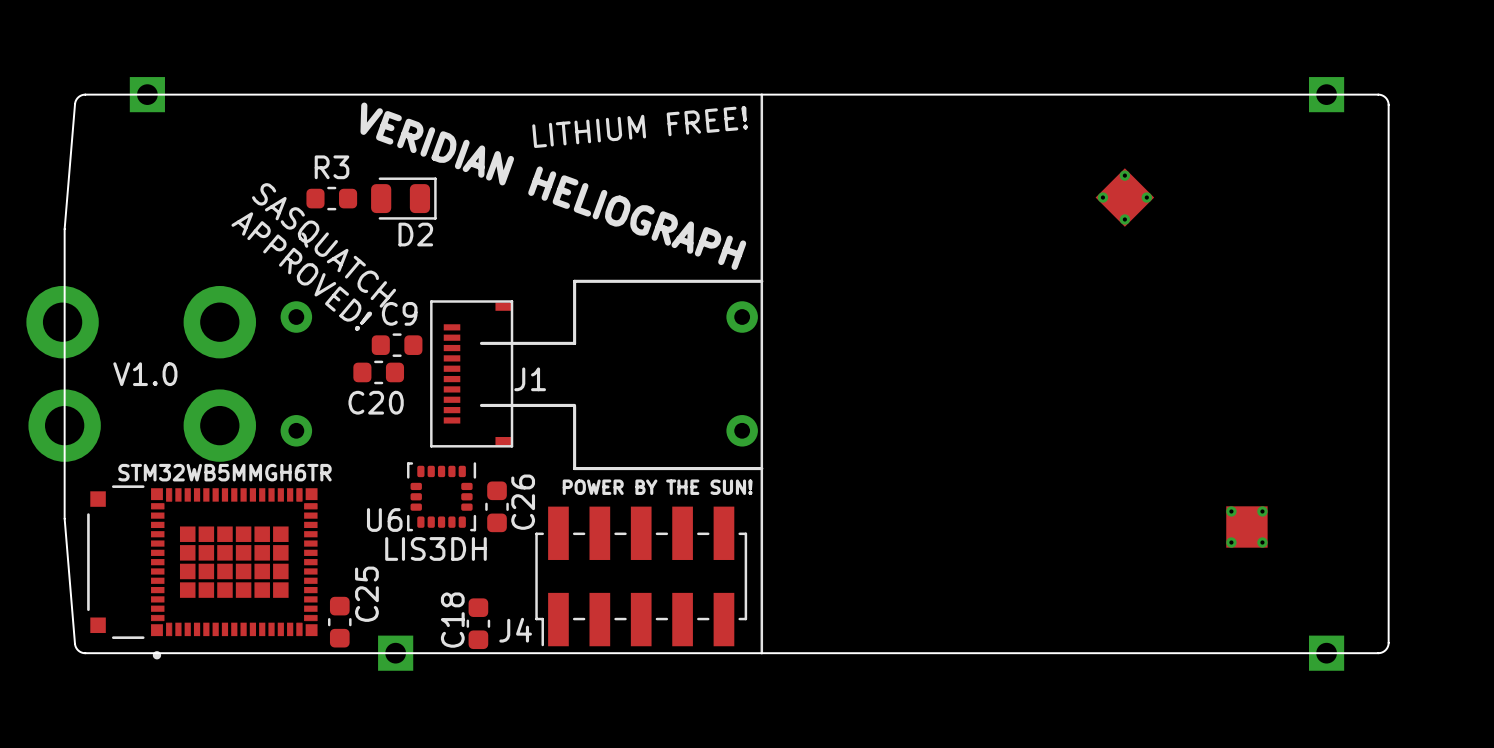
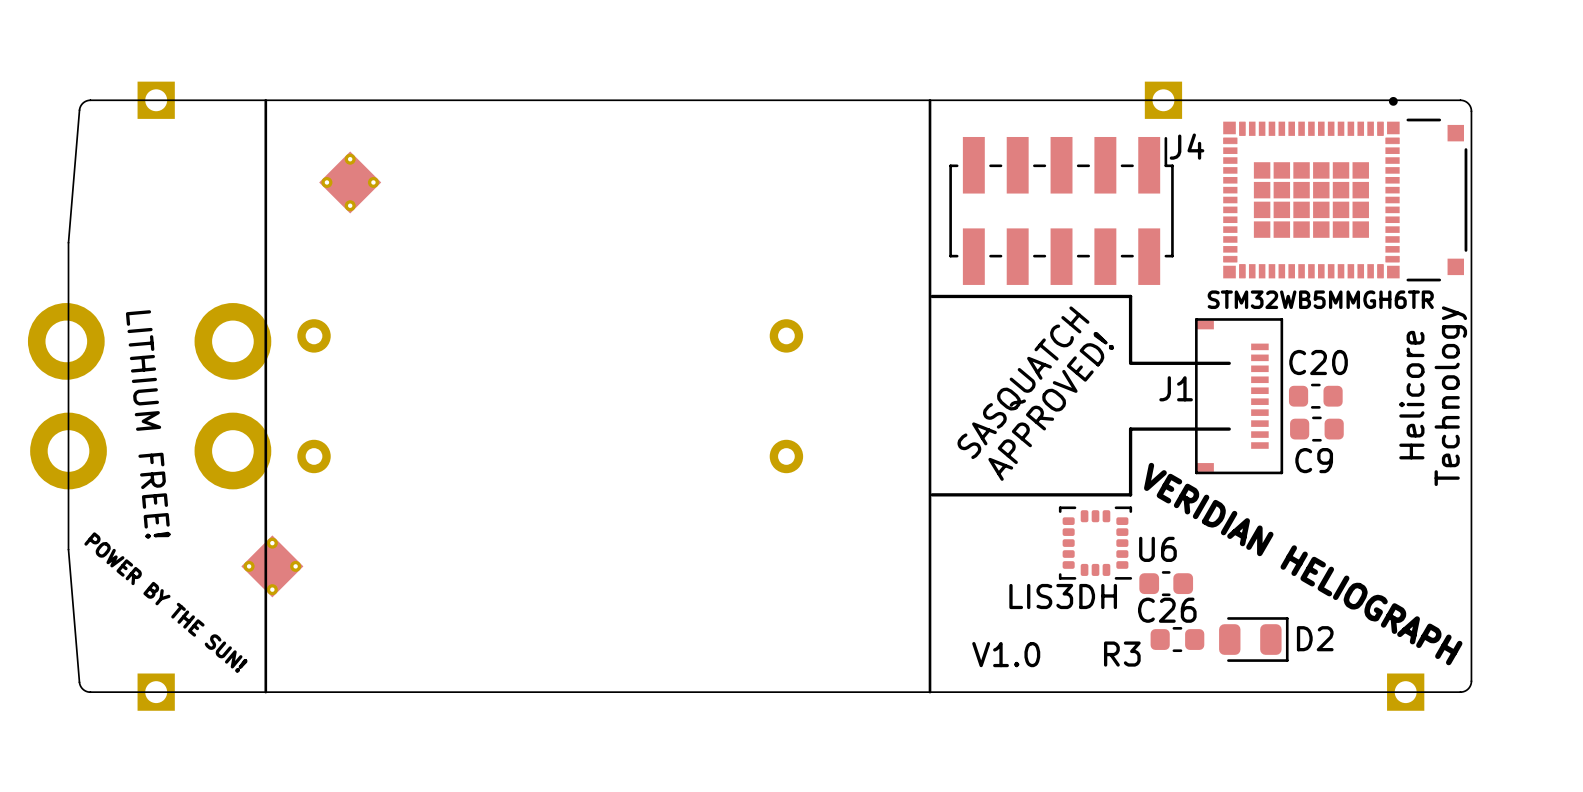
line: none -> (265, 100) (265, 692)
line: (761, 94) (761, 653) -> (930, 100) (930, 692)
part position: (1326, 94) -> (1163, 100)
text: LITHIUM FREE! (640, 126) -> none
R3 name position: R3 (332, 167) -> R3 (1122, 654)
part: none -> (350, 182)
part: none -> STM32WB5MMGH6TR (1345, 189)
text: VERIDIAN HELIOGRAPH (553, 186) -> none
part: (1124, 197) -> none
R3 position: (331, 198) -> (1177, 639)
D2 position: (403, 198) -> (1253, 639)
D2 name position: D2 (415, 234) -> D2 (1315, 638)
text: SASQUATCH (324, 245) -> none
text: APPROVED! (301, 271) -> none
line: none -> (932, 296) (1130, 296) (1130, 362)
line: (761, 281) (574, 281) (574, 343) (481, 343) -> none
C9 name position: C9 (399, 313) -> C9 (1314, 460)
line: none -> (1130, 363) (1229, 363)
C9 position: (397, 345) -> (1316, 429)
text: none -> SASQUATCH (1023, 382)
C20 position: (378, 372) -> (1315, 396)
text: none -> Helicore (1411, 395)
J1 rotation: 0° (471, 373) -> 180° (1239, 396)
J1 position: (471, 373) -> (1239, 396)
text: none -> Technology (1450, 396)
text: V1.0 (145, 374) -> none
text: none -> APPROVED! (1051, 406)
text: none -> LITHIUM FREE! (148, 424)
C20 name position: C20 (376, 402) -> C20 (1318, 362)
line: none -> (1229, 429) (1130, 429) (1130, 494) (932, 494)
line: (481, 405) (574, 405) -> none
line: (574, 406) (574, 468) (761, 468) -> none
text rotation: 0° (657, 487) -> 40° clockwise (165, 602)
text position: POWER BY THE SUN! (657, 487) -> POWER BY THE SUN! (165, 602)
U6 rotation: 0° (441, 496) -> 90° clockwise (1095, 543)
U6 position: (441, 496) -> (1095, 543)
C26 rotation: 0° (497, 506) -> 90° clockwise (1166, 583)
C26 position: (497, 506) -> (1166, 583)
U6 name position: U6 (384, 520) -> U6 (1157, 549)
part: (1246, 526) -> none
text: none -> VERIDIAN HELIOGRAPH (1303, 564)
part: none -> (272, 566)
part: STM32WB5MMGH6TR (202, 572) -> none
J4 rotation: 0° (641, 576) -> 180° (1061, 210)
J4 position: (641, 576) -> (1061, 210)
text: none -> V1.0 (1006, 654)
C25: (339, 622) -> none
C18: (478, 623) -> none
part position: (395, 653) -> (156, 692)

